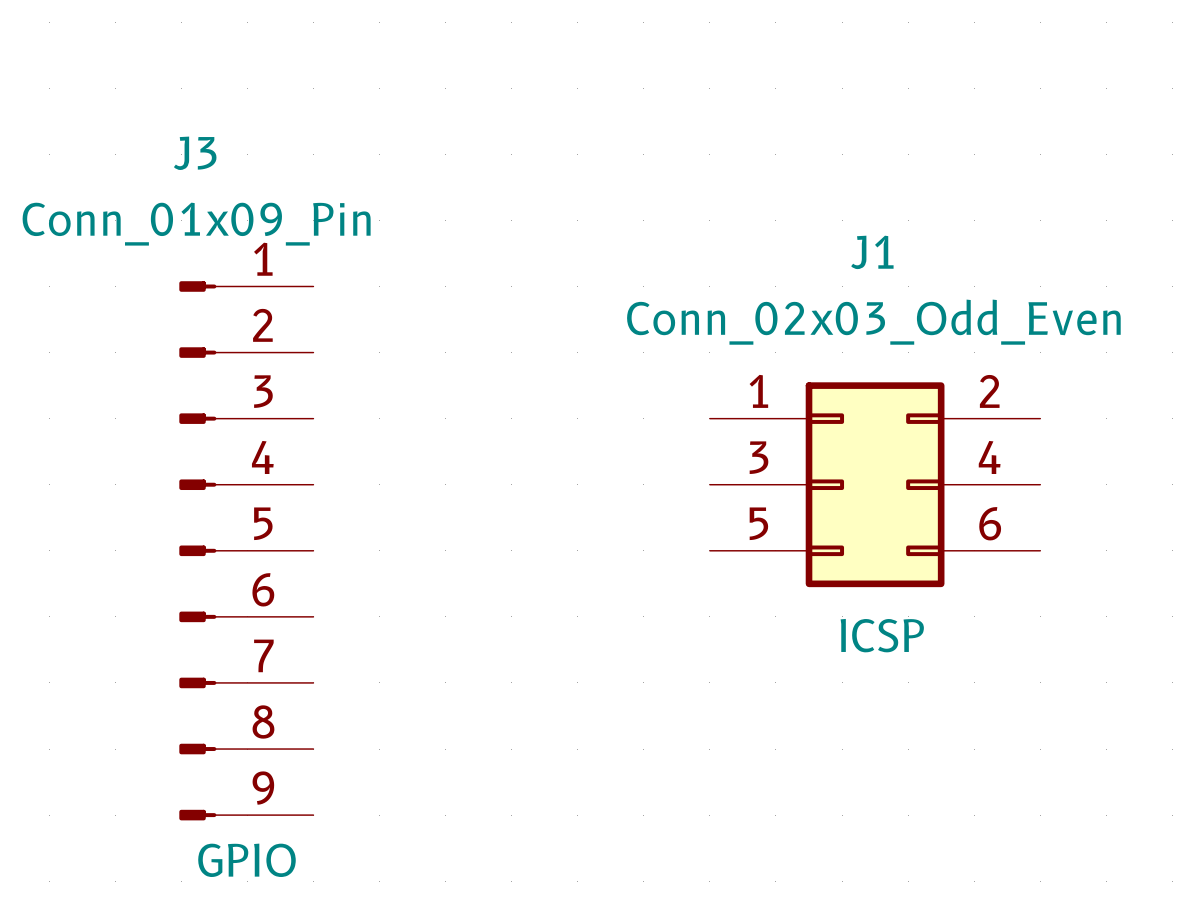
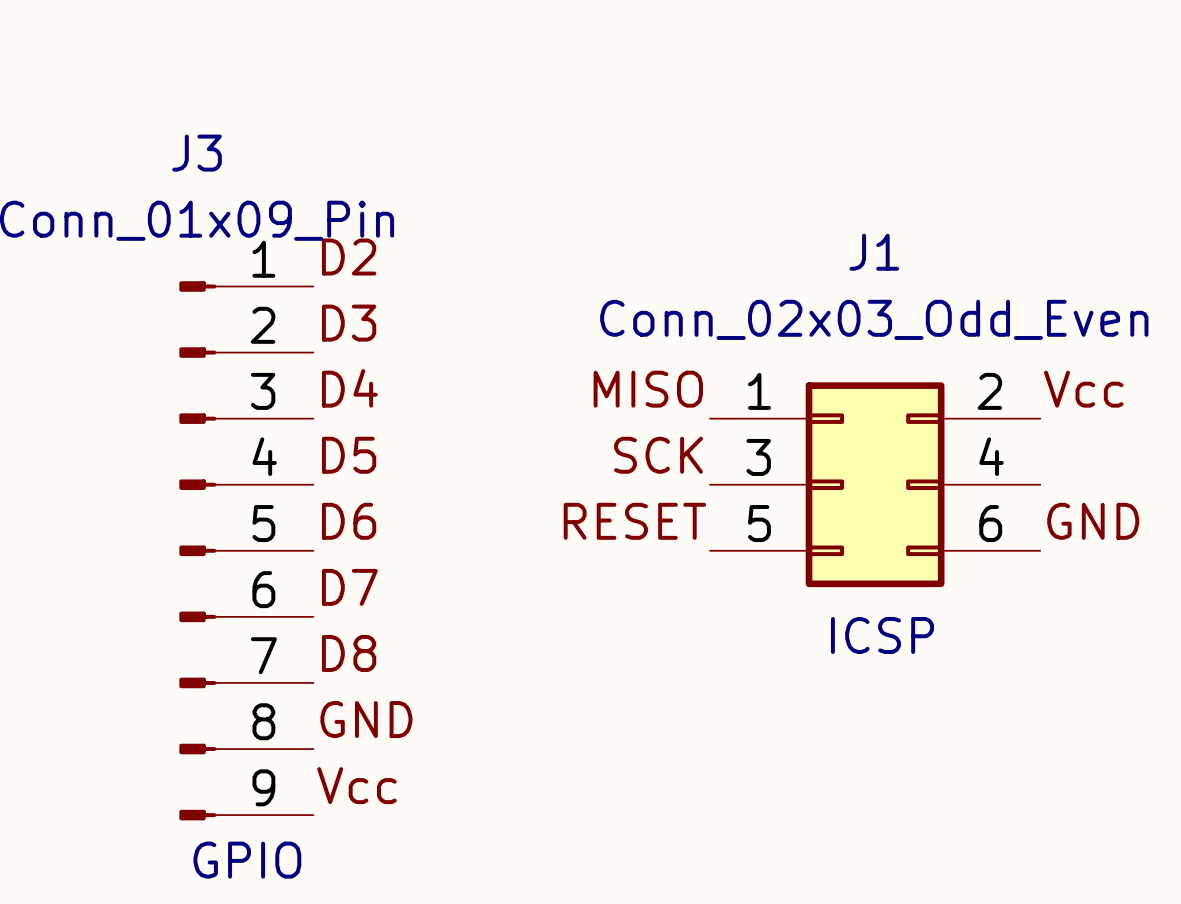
label: none -> D2 (349, 257)
label: none -> D3 (349, 323)
label: none -> D4 (349, 388)
label: none -> MISO (648, 389)
label: none -> Vcc (1083, 389)
label: none -> D5 (349, 455)
label: none -> SCK (658, 455)
label: none -> D6 (349, 521)
label: none -> RESET (634, 521)
label: none -> GND (1093, 521)
label: none -> D7 (349, 587)
label: none -> D8 (349, 653)
label: none -> GND (366, 719)
label: none -> Vcc (356, 785)

